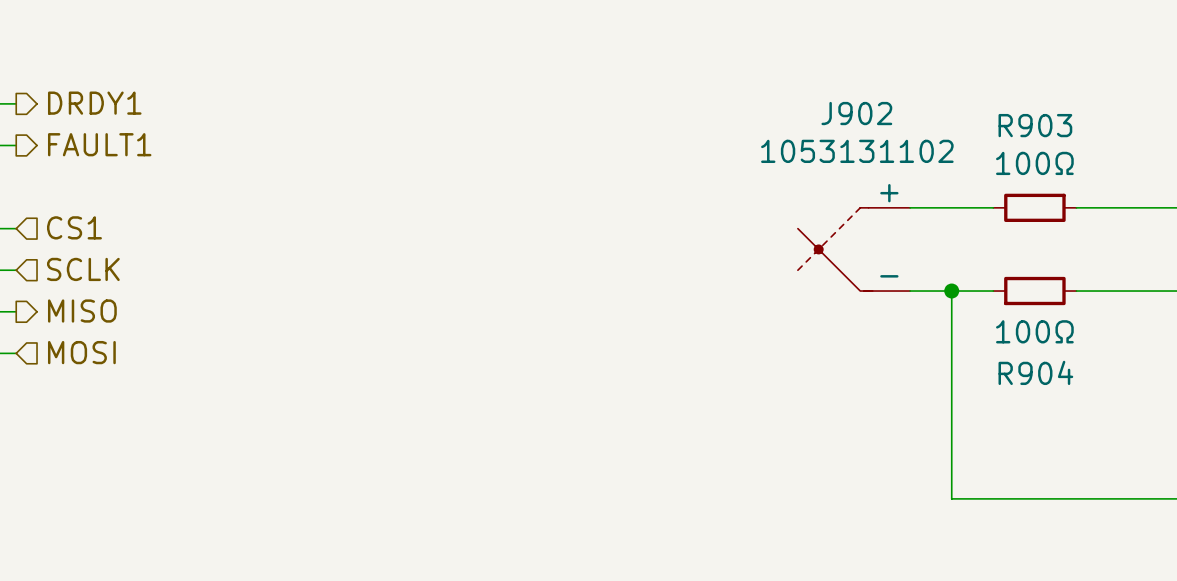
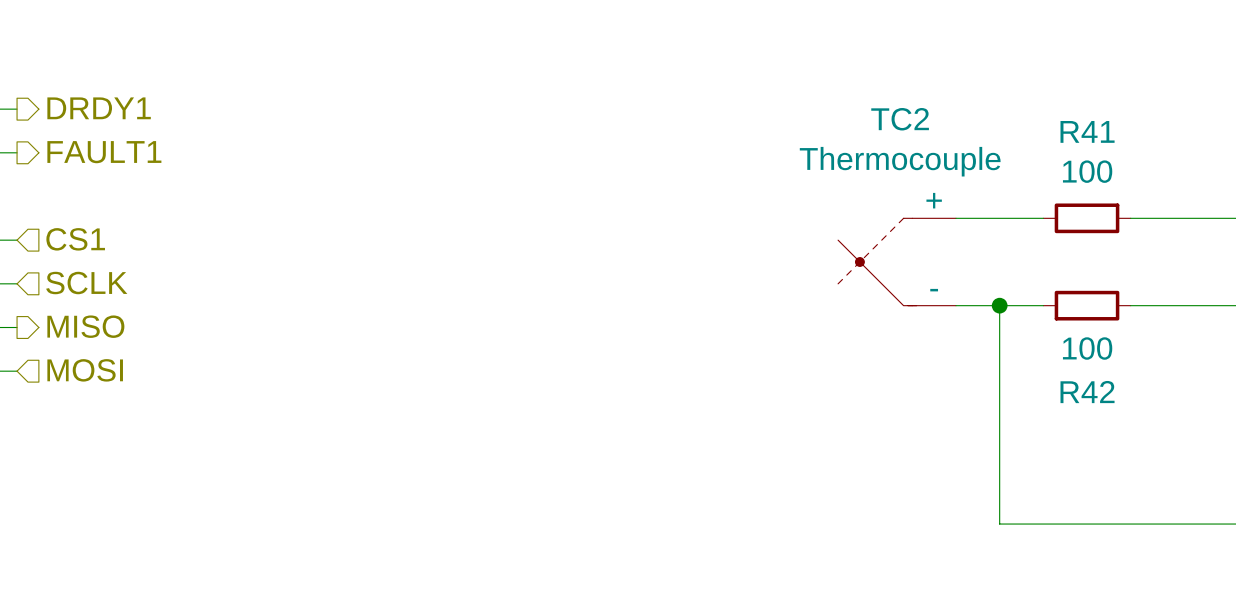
J902 name: J902 (856, 113) -> TC2 (900, 119)
R903 name: R903 (1035, 125) -> R41 (1087, 131)
J902 value: 1053131102 (857, 151) -> Thermocouple (900, 161)
R903 value: 100Ω (1034, 163) -> 100 (1087, 171)
R904 value: 100Ω (1034, 331) -> 100 (1087, 348)
R904 name: R904 (1035, 372) -> R42 (1087, 392)

